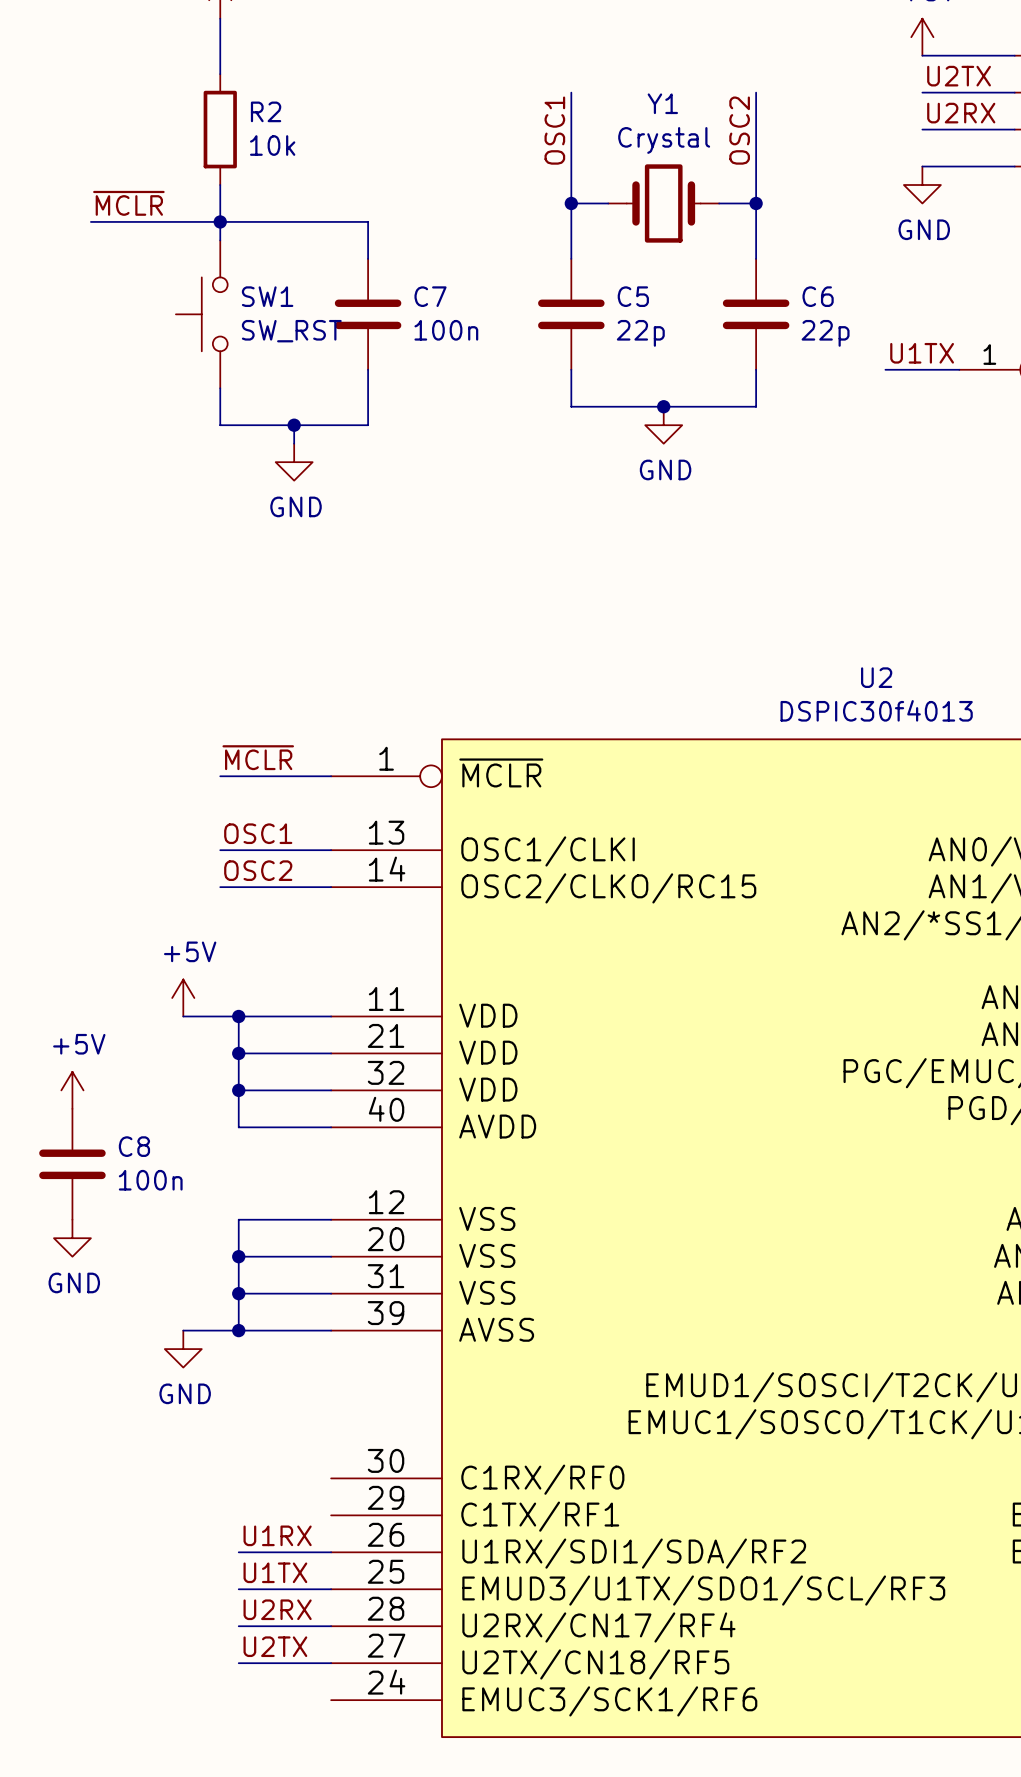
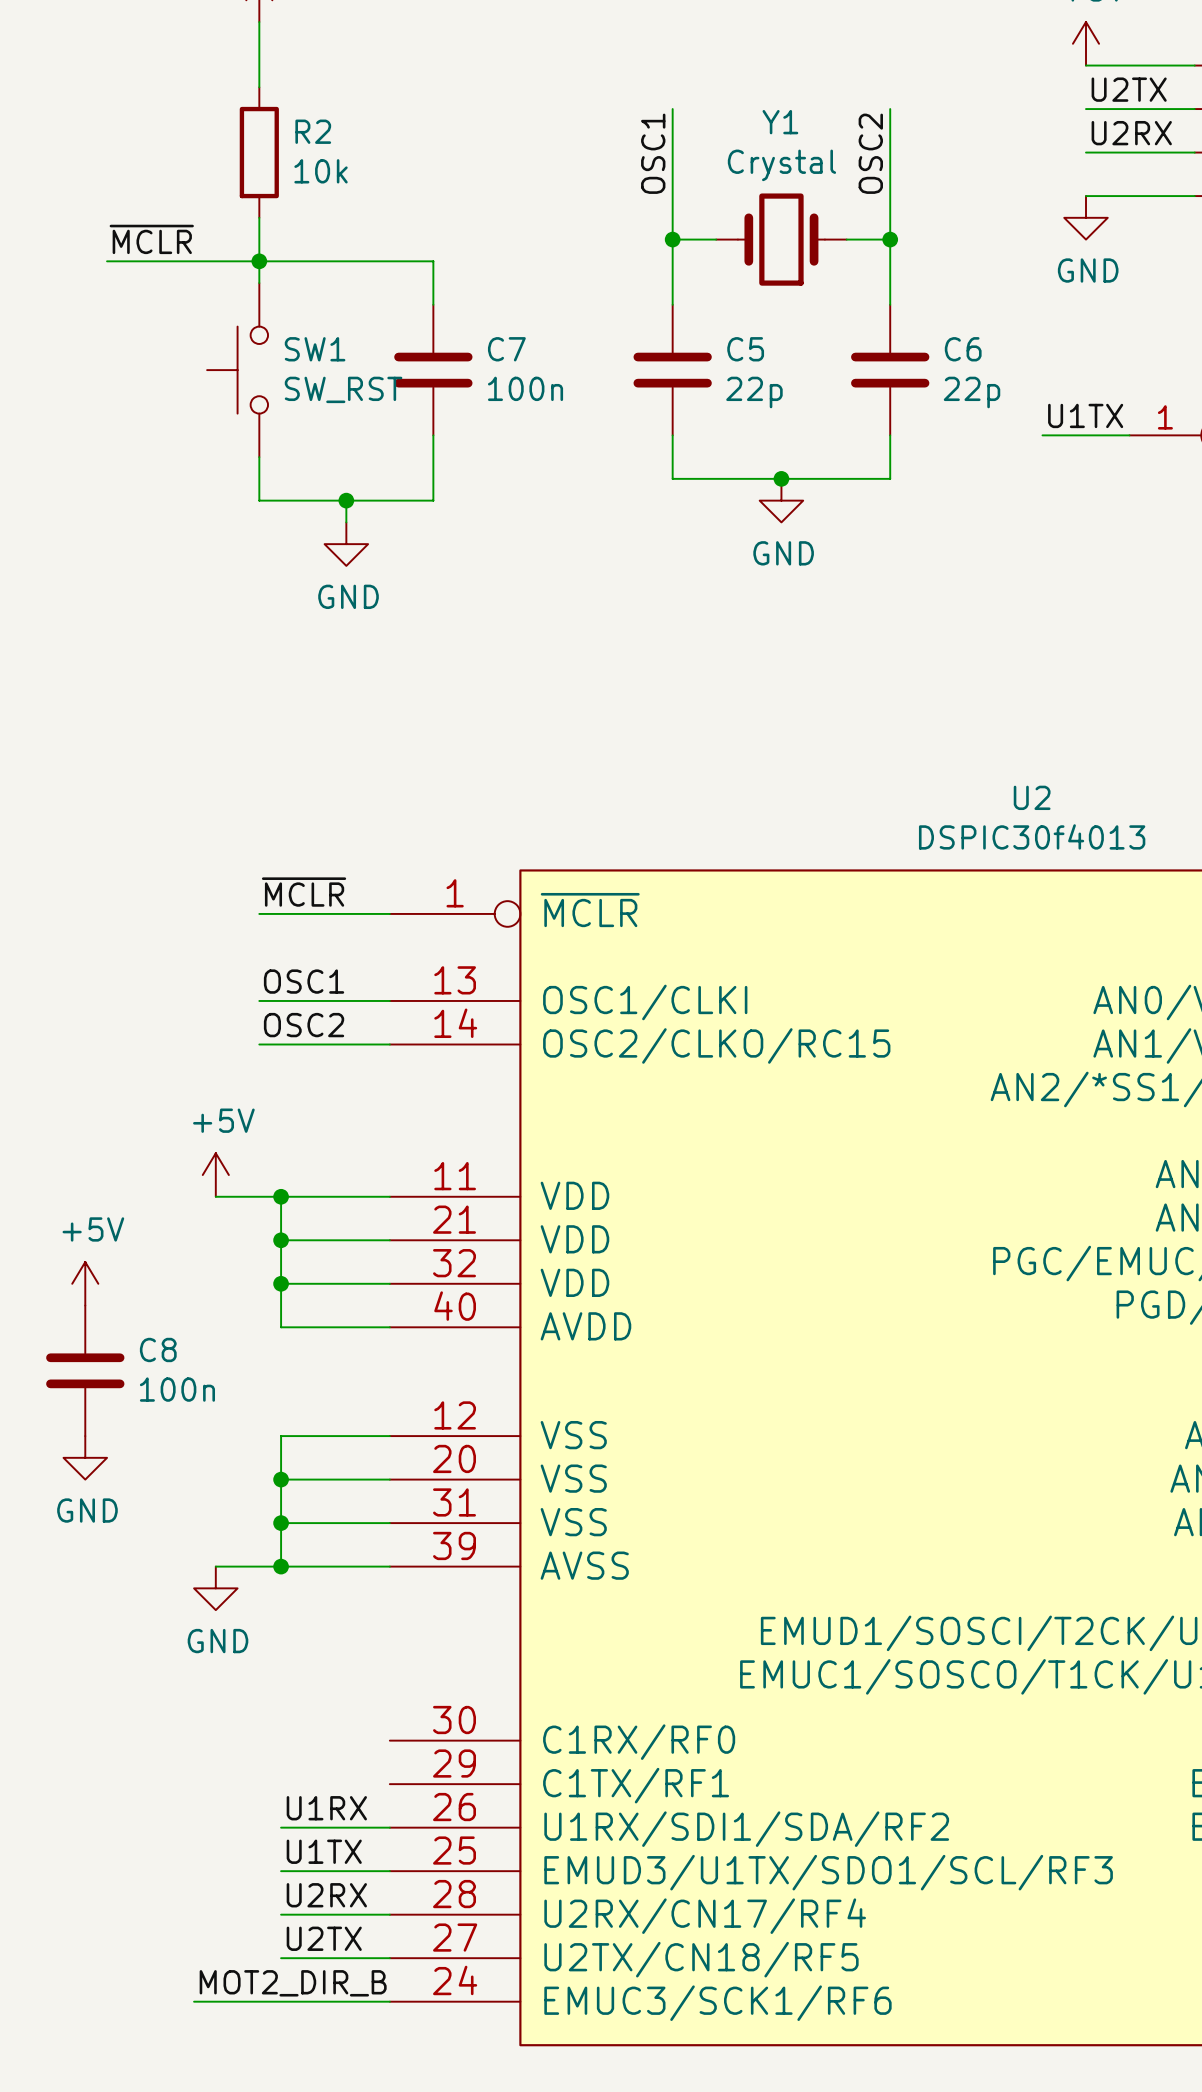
label: none -> MOT2_DIR_B (293, 1983)
wire: none -> (194, 2001) (389, 2001)

